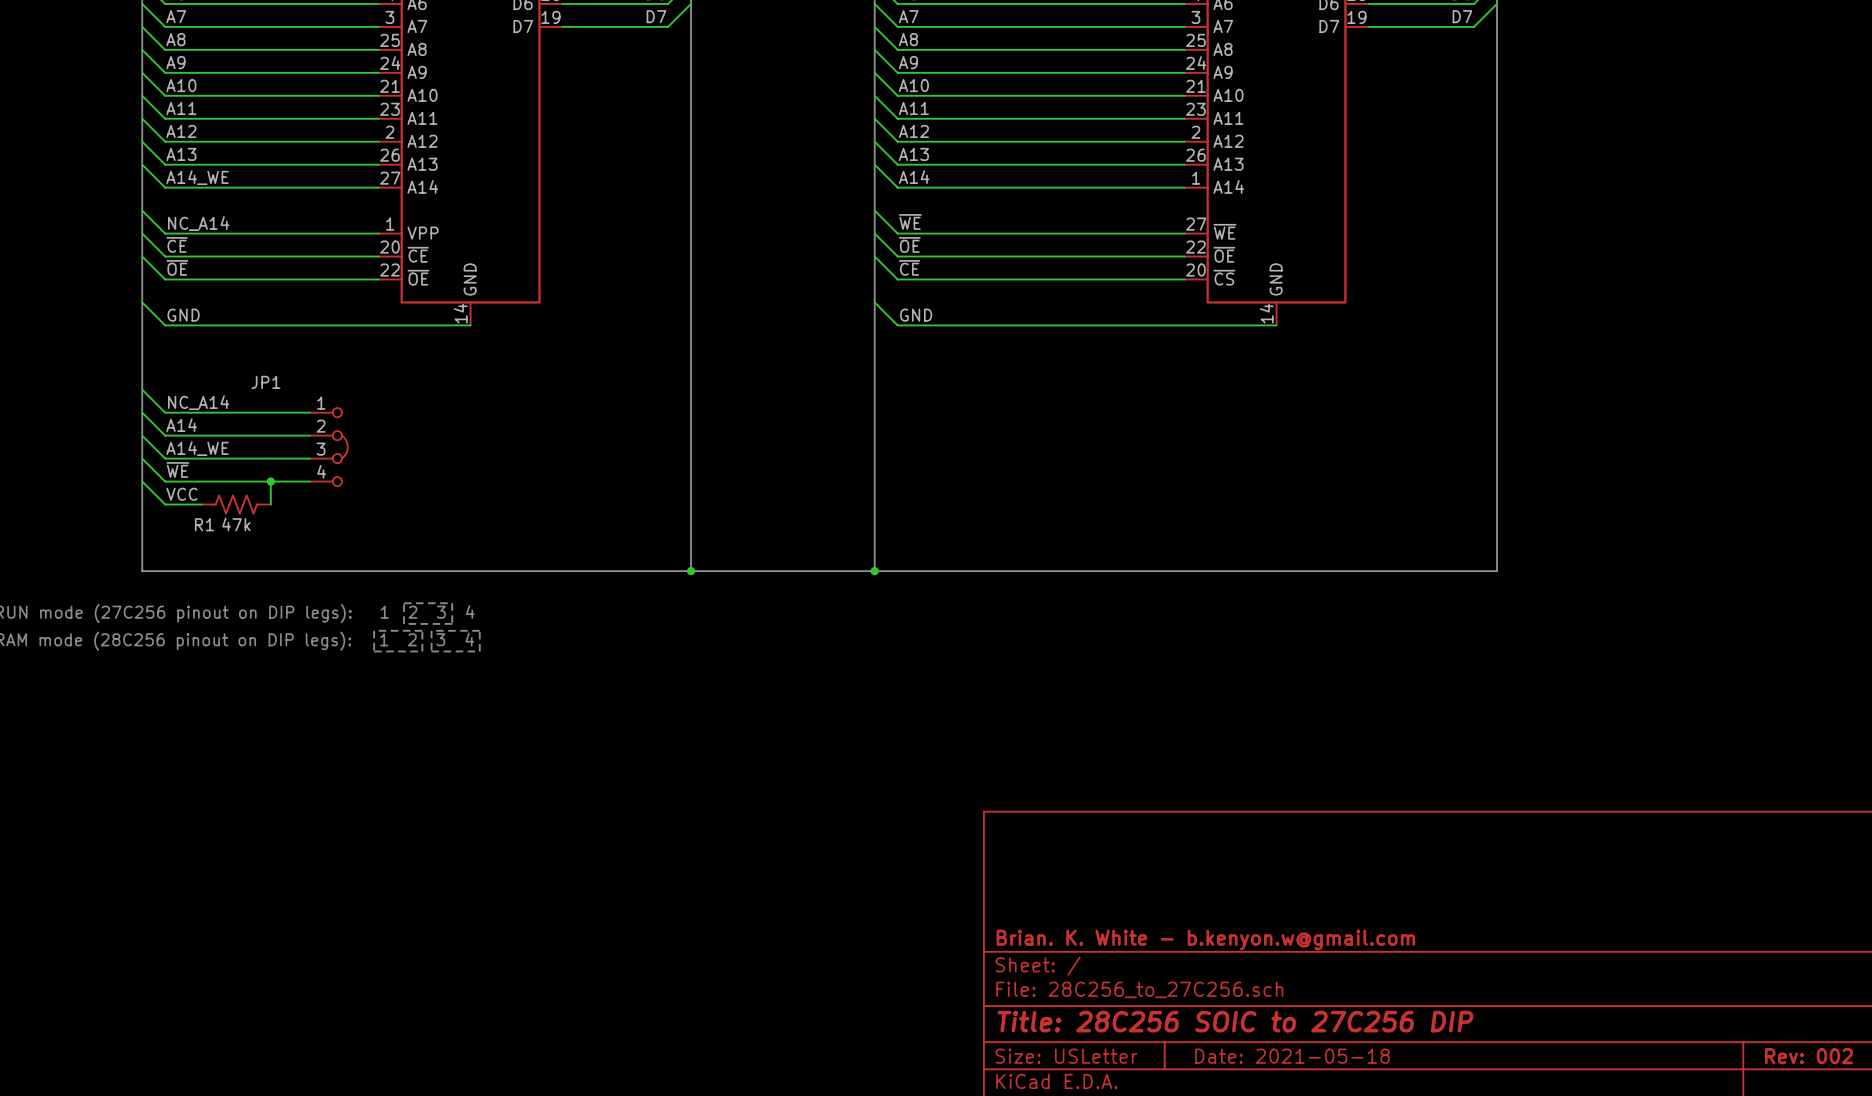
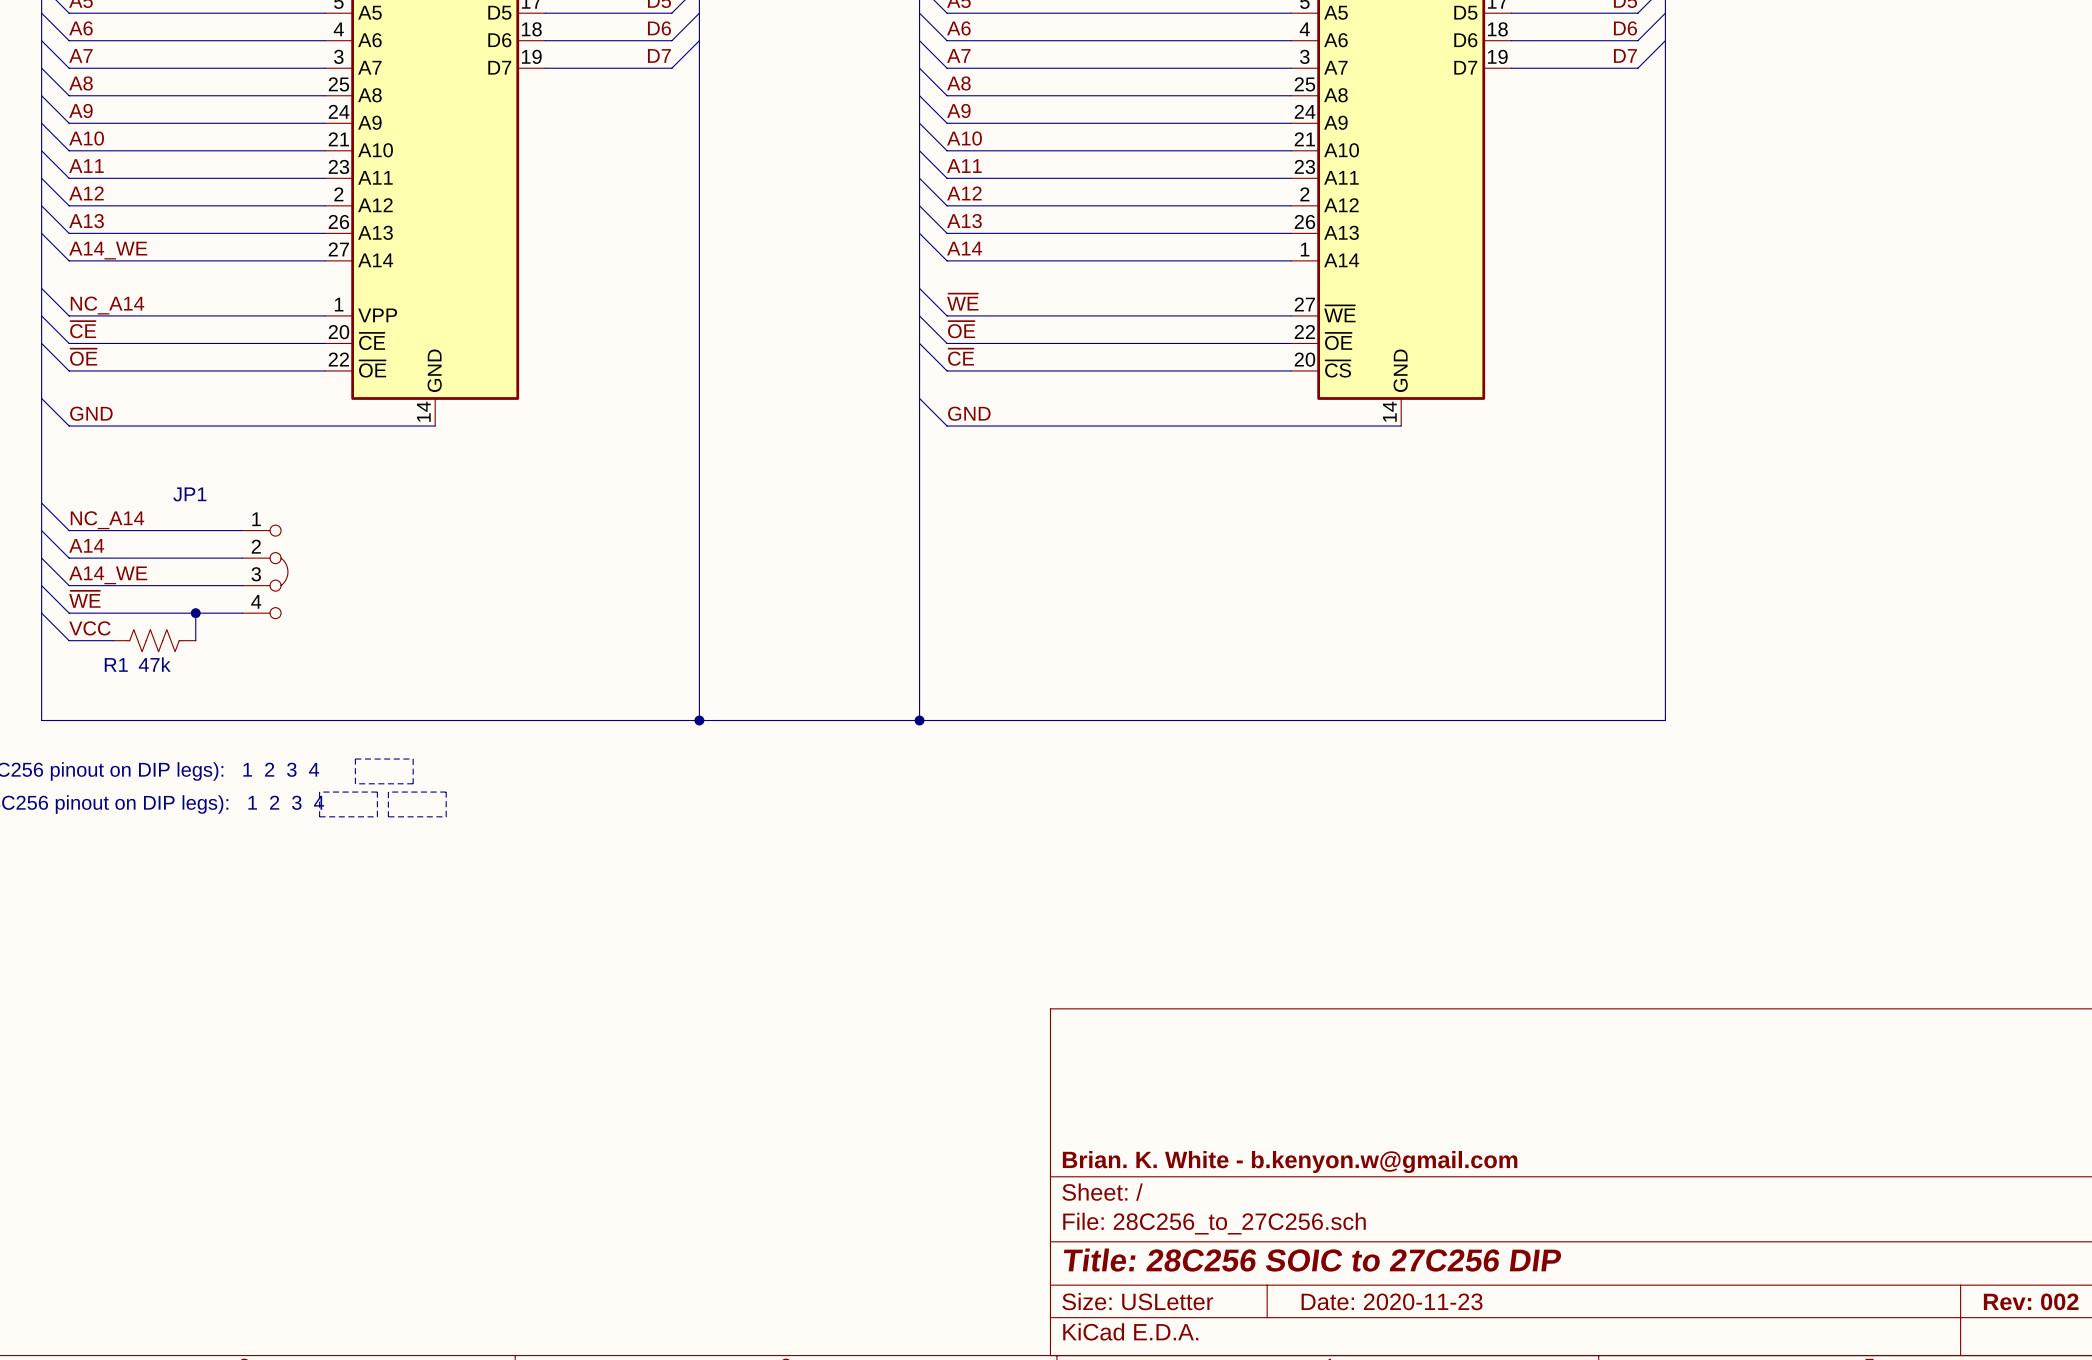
title block: Date: 2021-05-18 (1292, 1056) -> Date: 2020-11-23 (1392, 1301)

